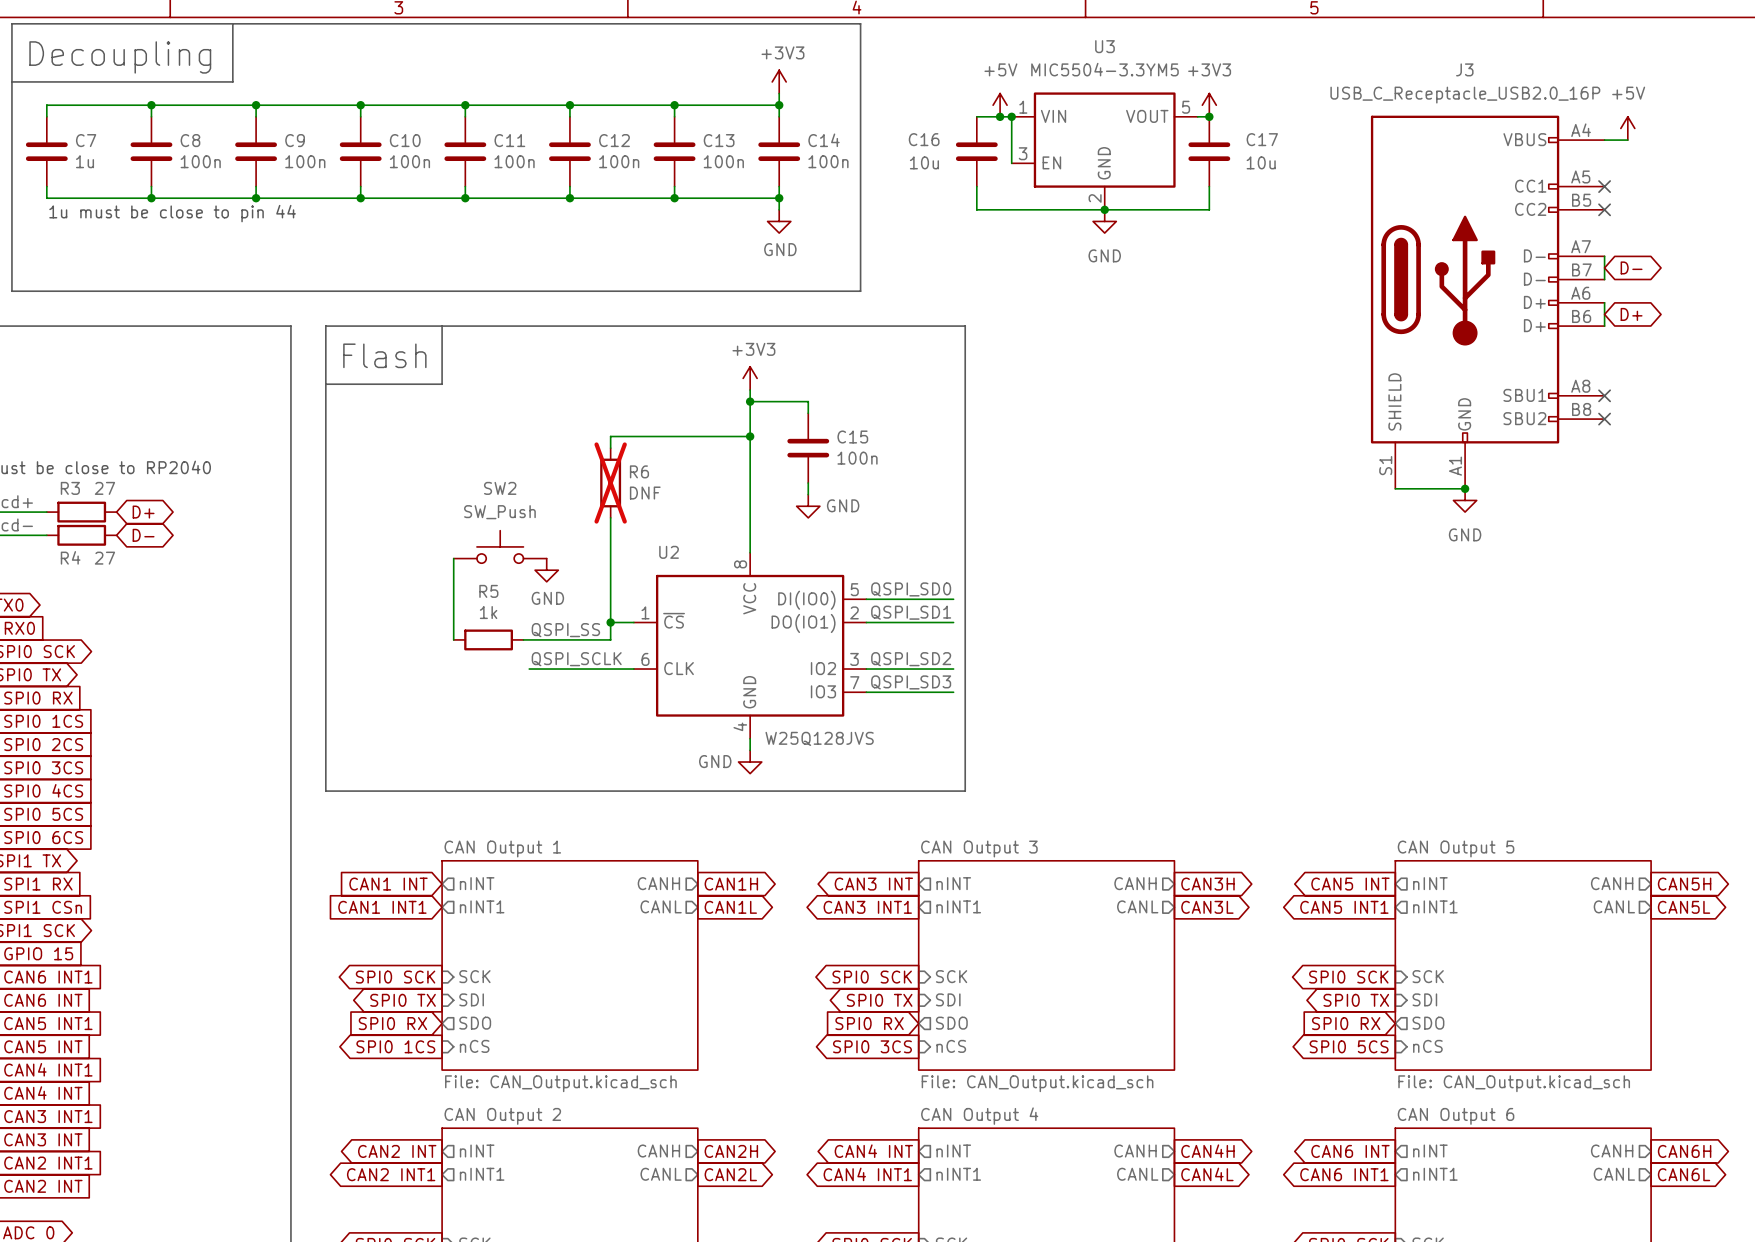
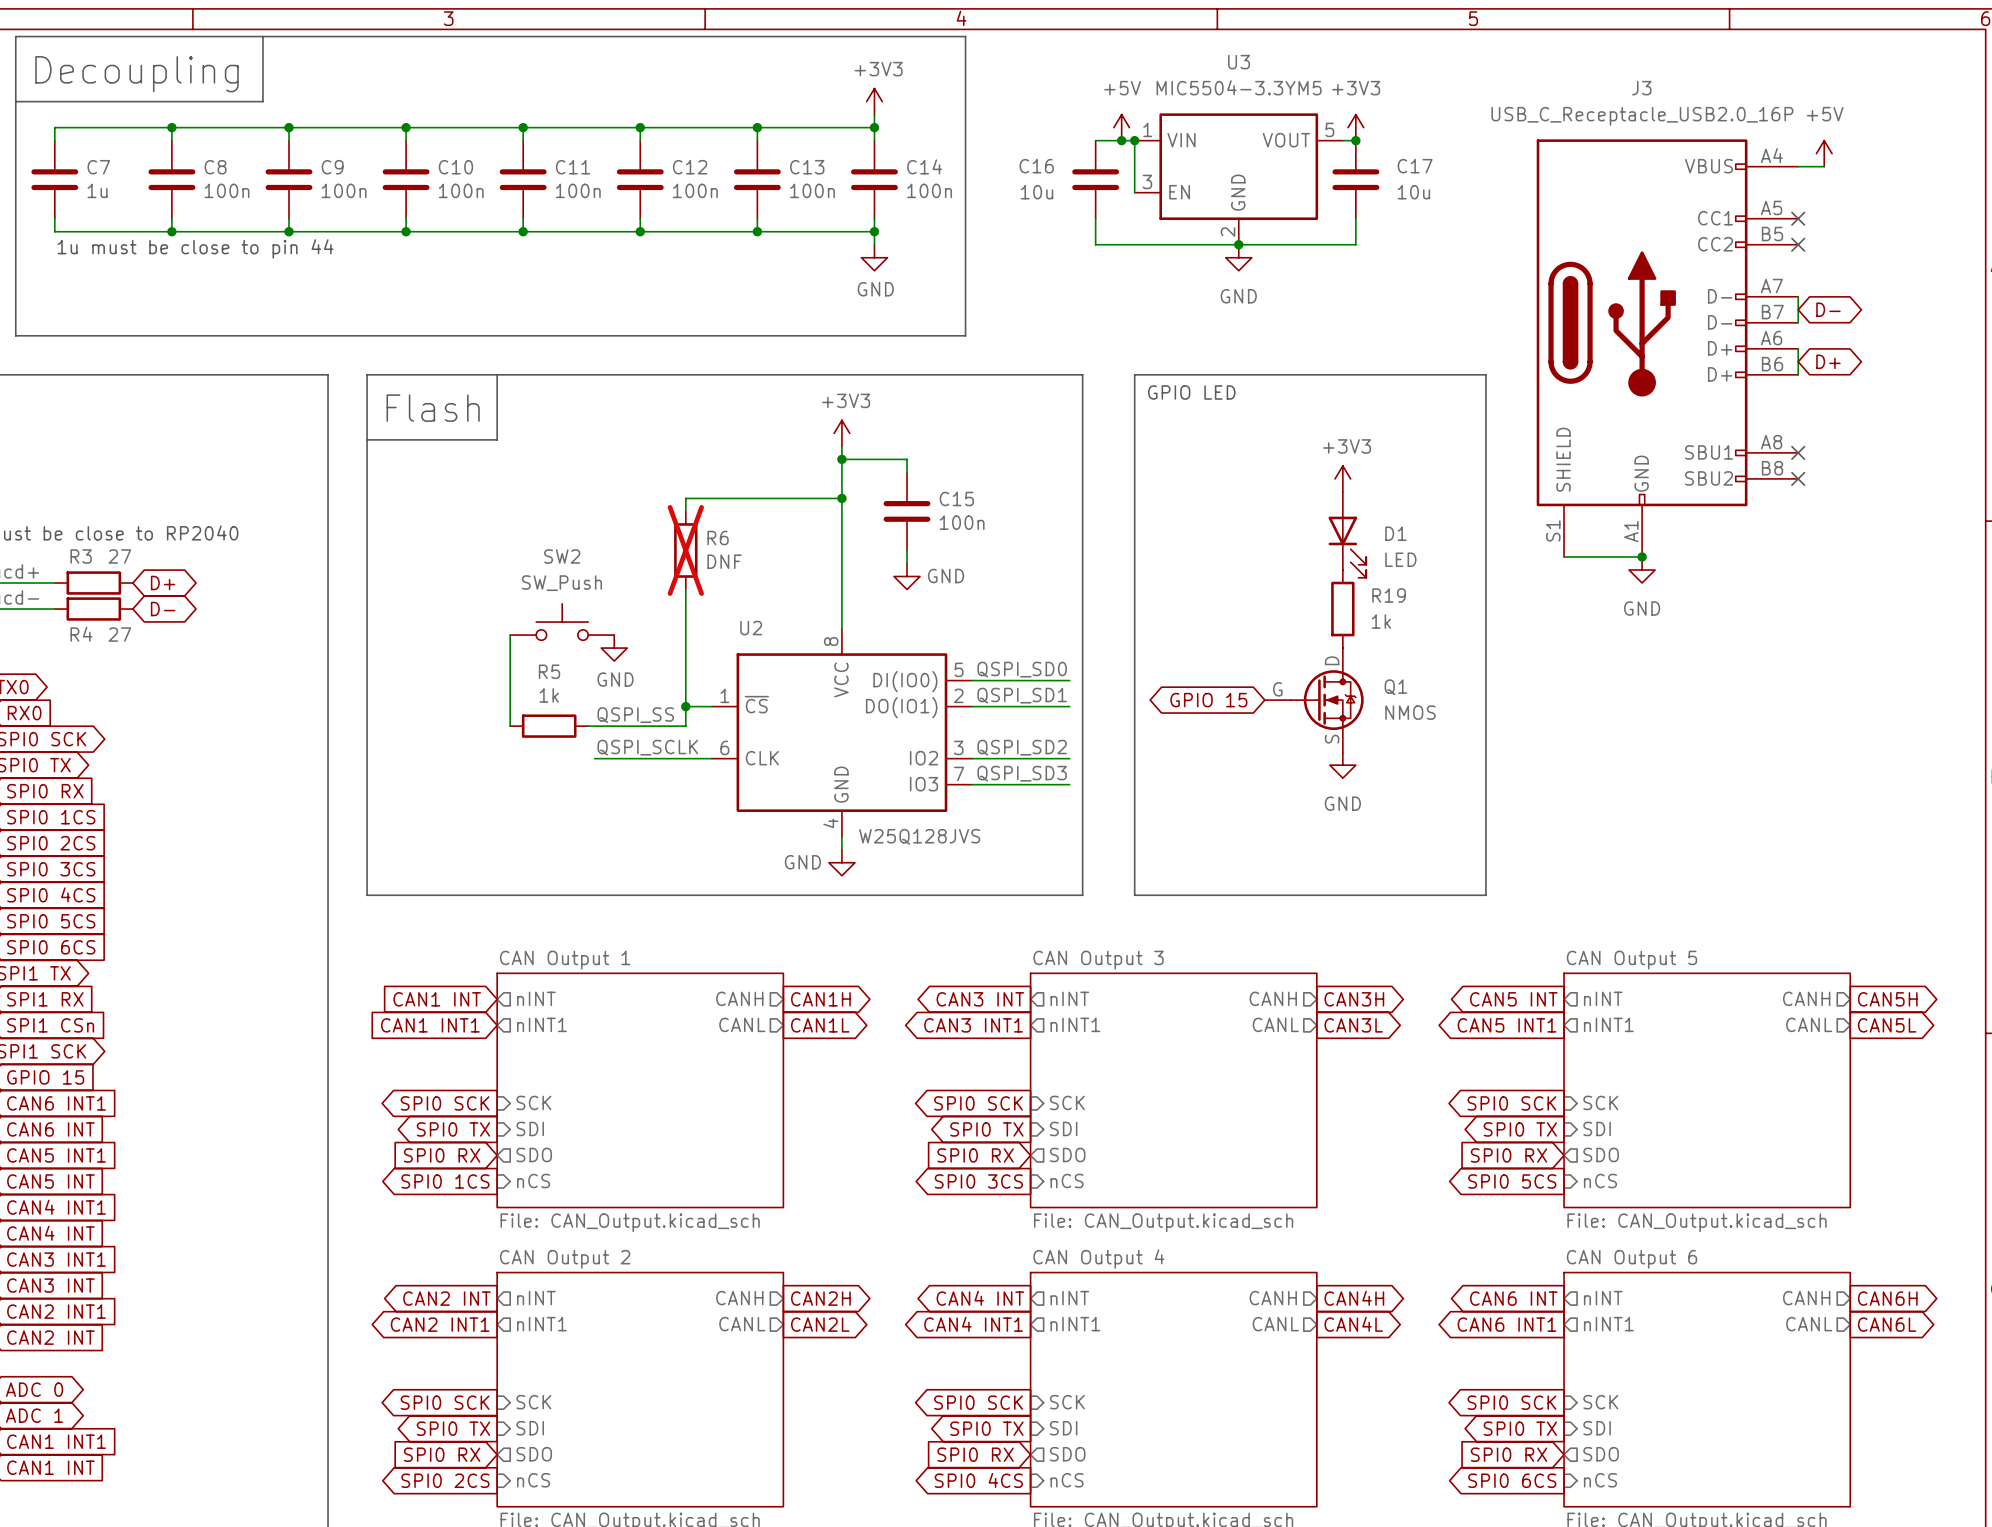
line: none -> (1134, 374) (1485, 374) (1485, 895) (1134, 895) (1134, 374)
text: none -> GPIO LED (1191, 392)
power symbol: none -> +3V3 (1342, 478)
D1: none -> LED (1347, 534)
R19: none -> 1k (1342, 609)
global label: none -> GPIO 15 (1208, 700)
Q1: none -> NMOS (1314, 700)
power symbol: none -> GND (1342, 765)

